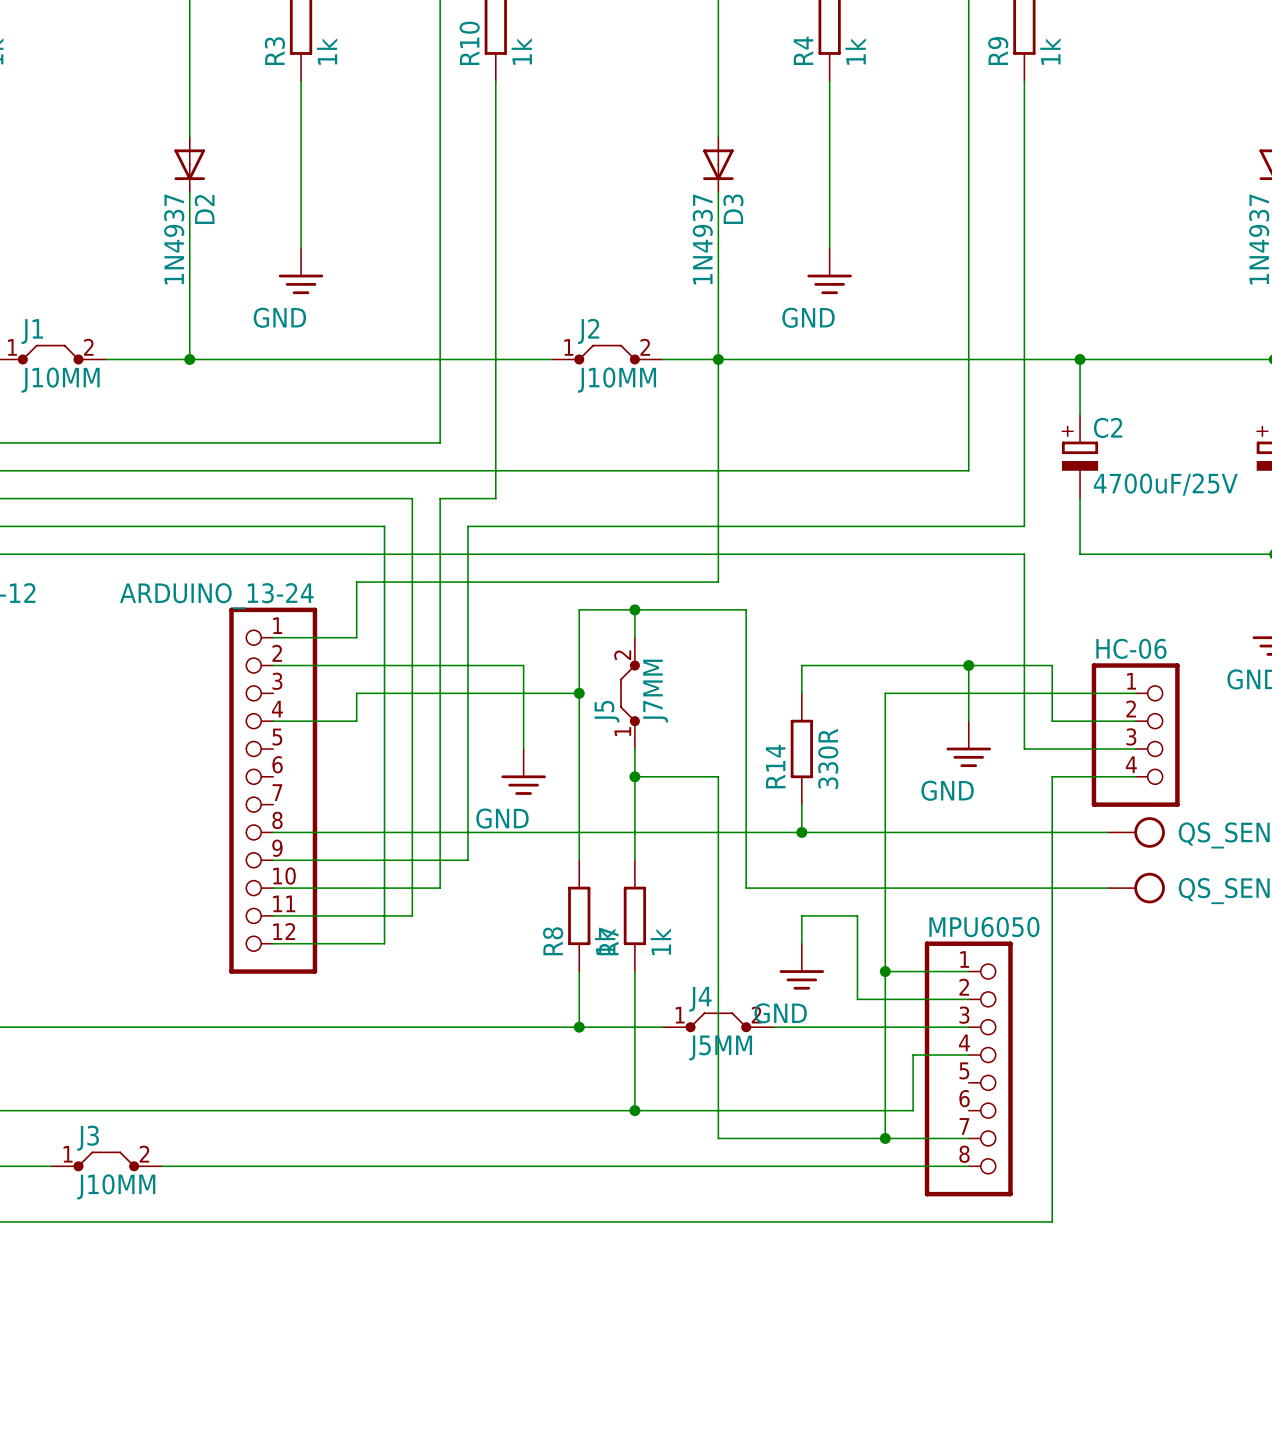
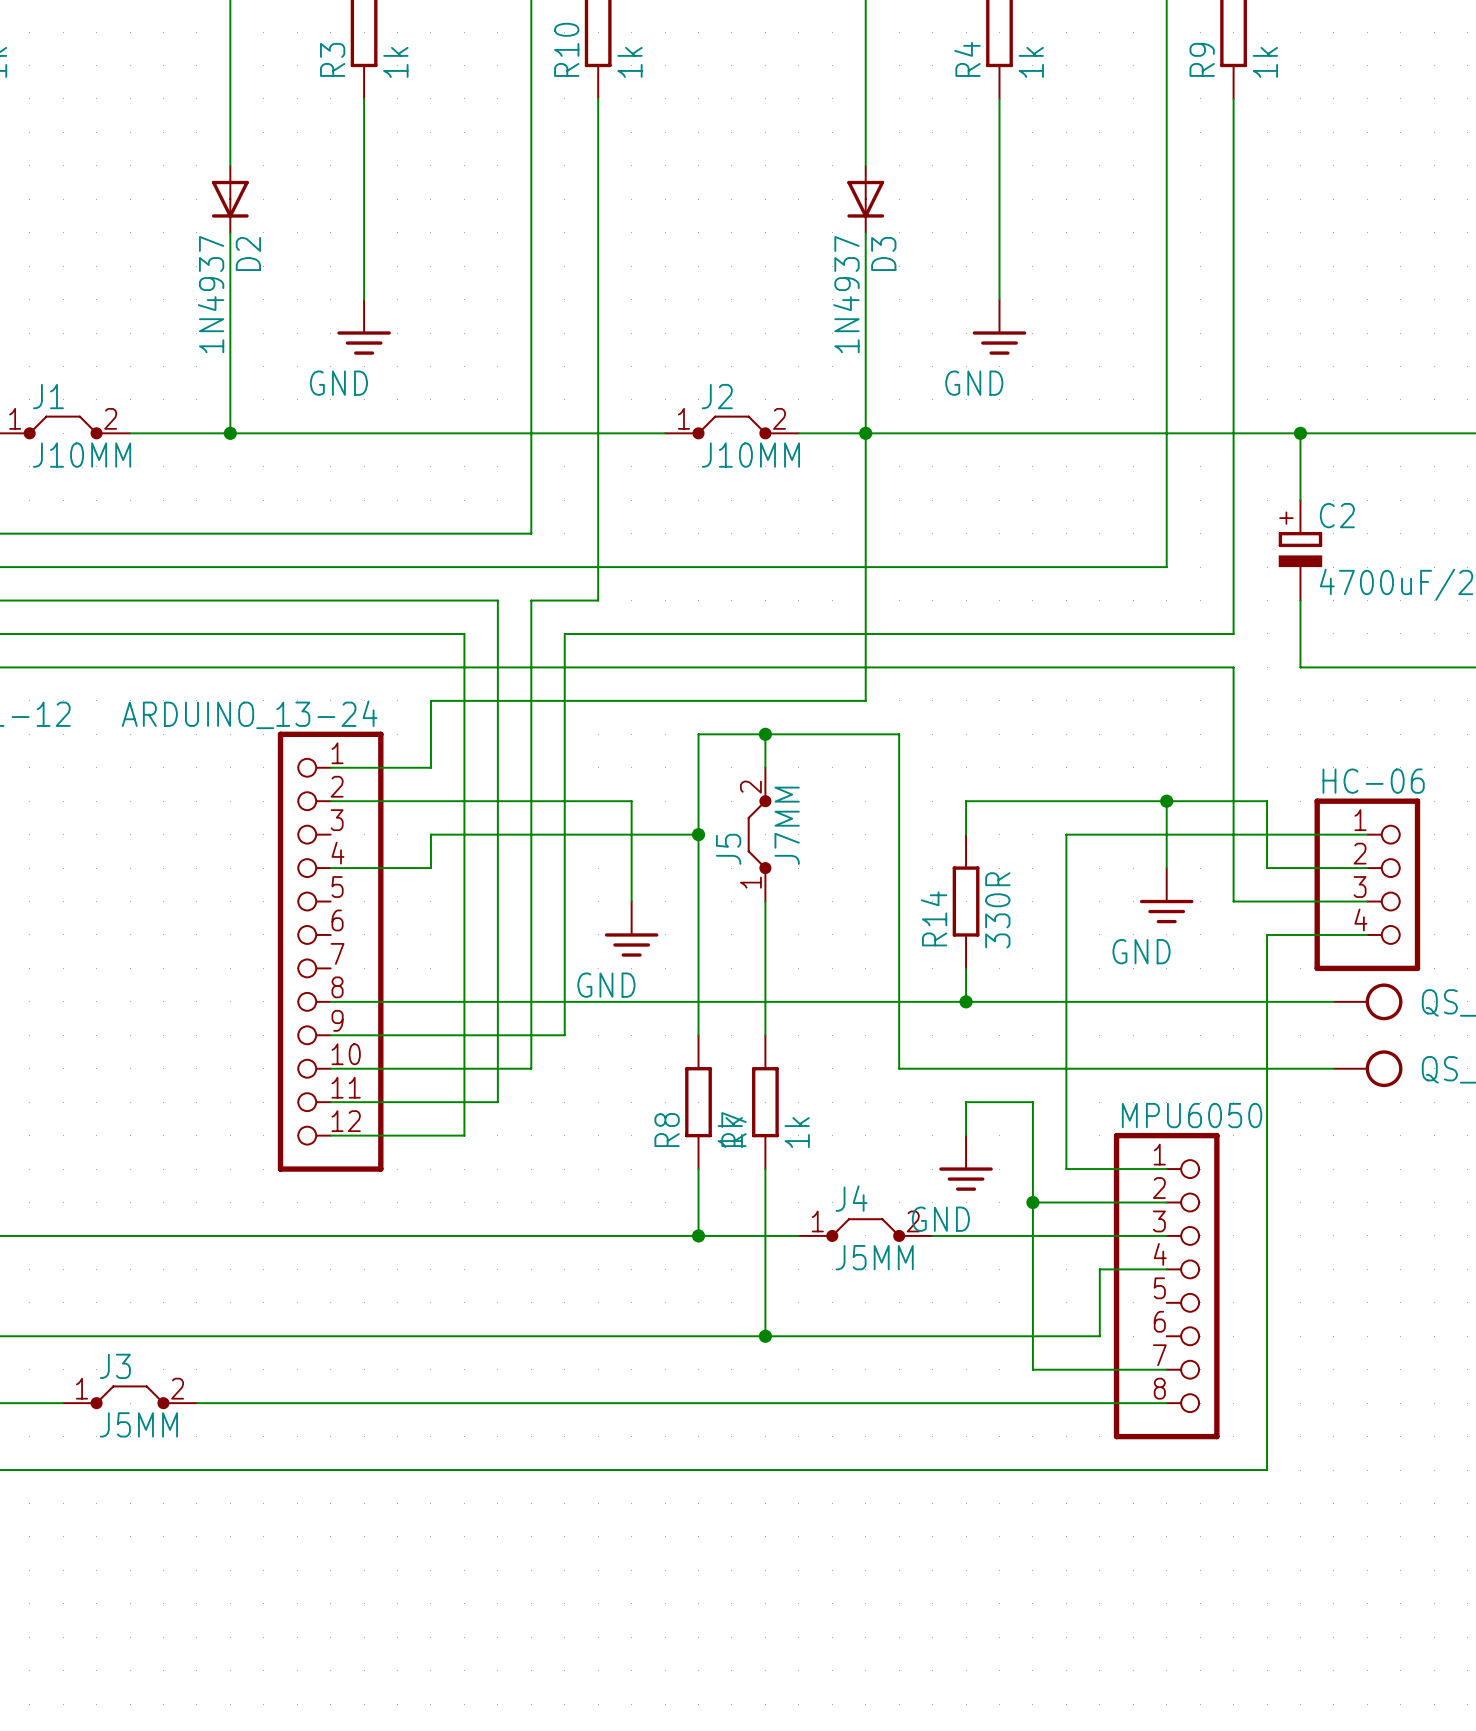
wire: (634, 776) (718, 776) (718, 1138) (857, 1138) -> (1032, 1202) (1032, 1369)
junction: (634, 776) -> none
wire: (885, 971) (885, 1138) -> none
junction position: (885, 971) -> (1032, 1202)
junction: (885, 1138) -> none
J3 value: J10MM (116, 1186) -> J5MM (138, 1424)

